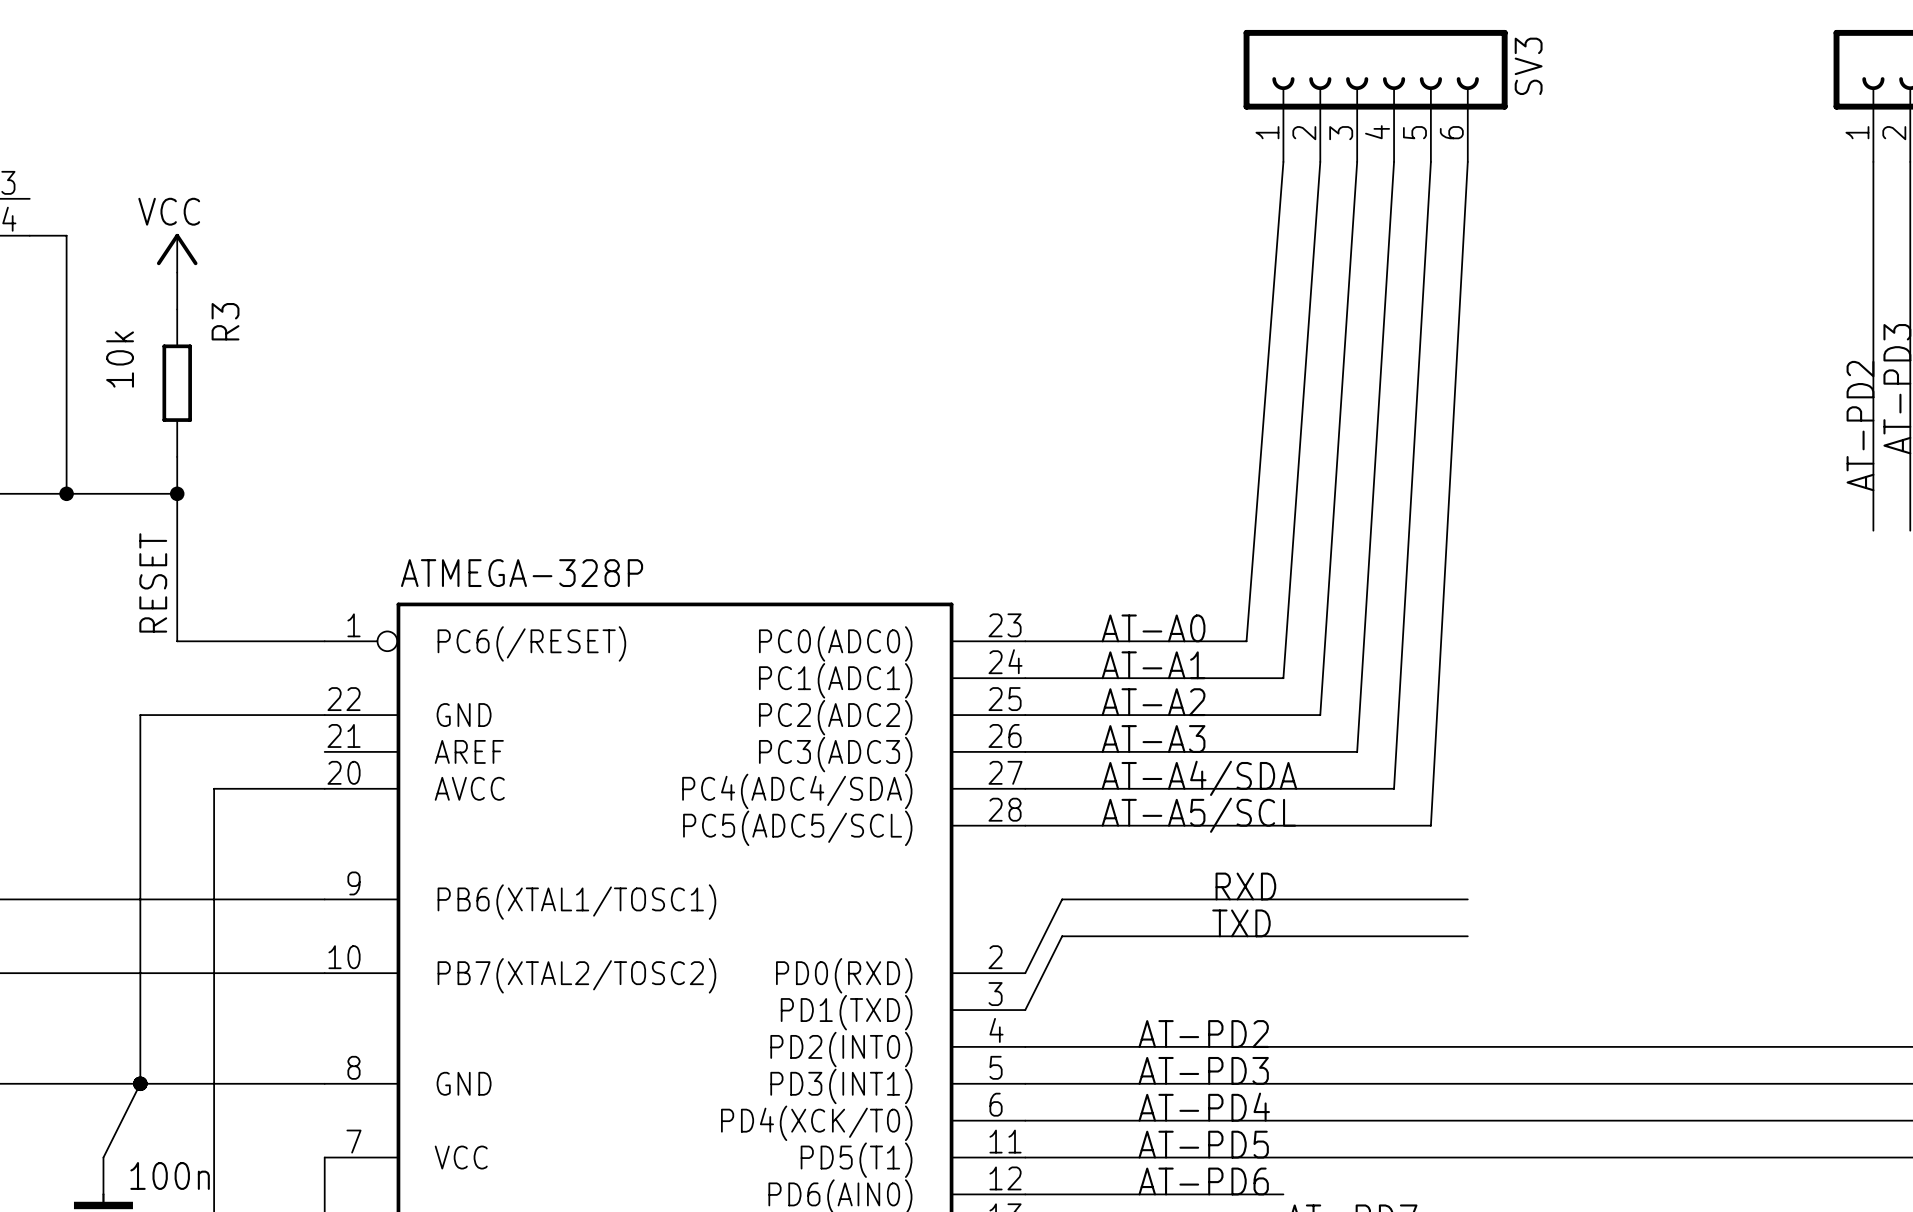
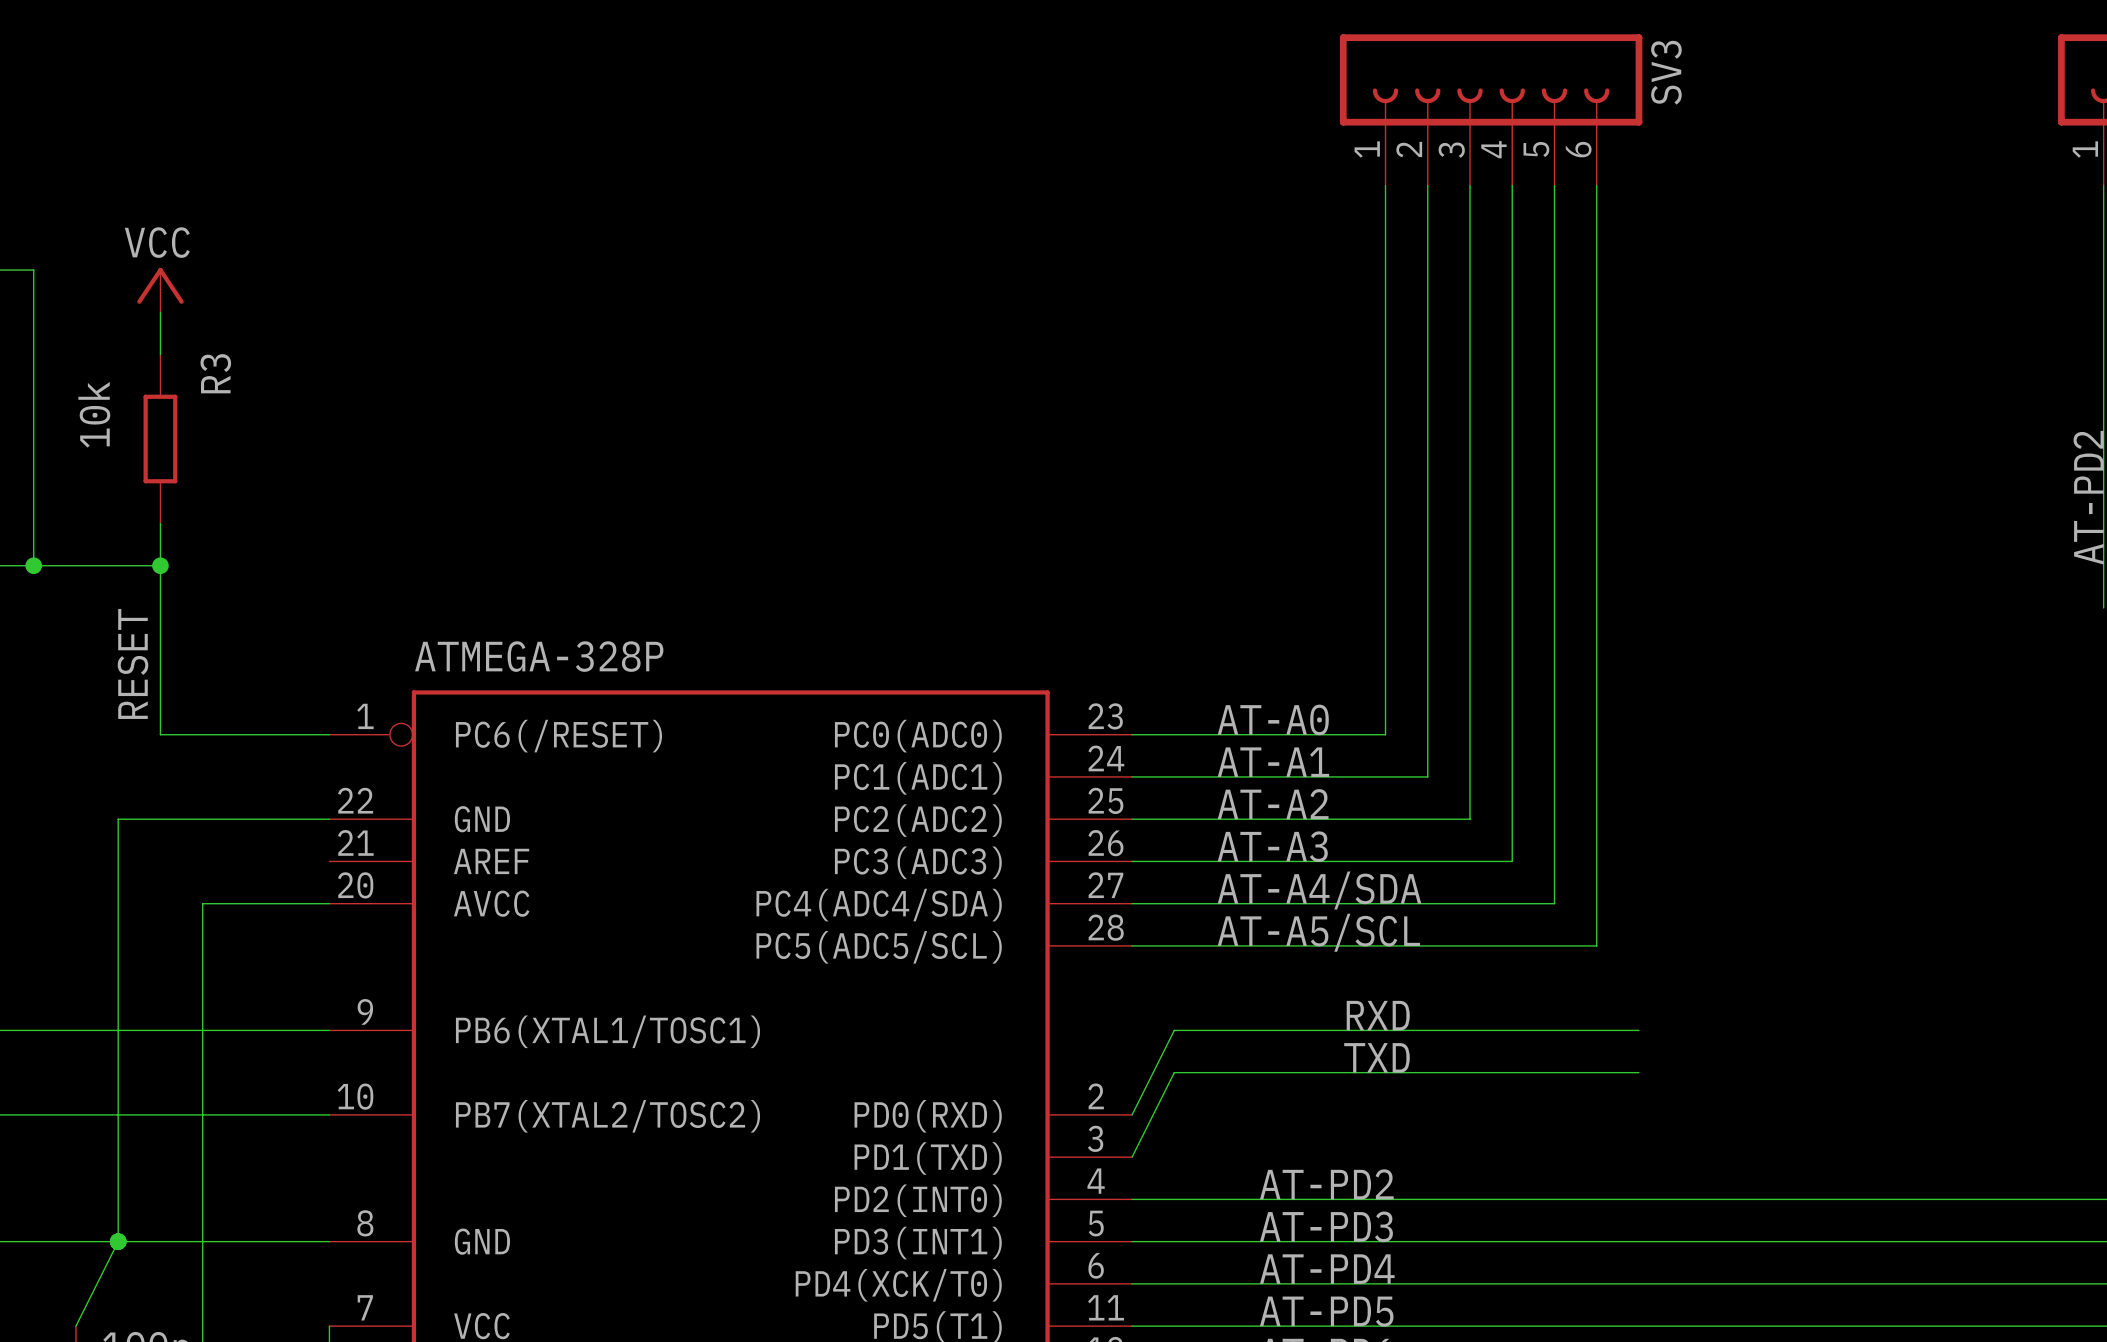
SV3 position: (1375, 95) -> (1491, 109)
wire: (1283, 161) (1246, 641) -> (1385, 185) (1385, 734)
wire: (1320, 161) (1283, 678) -> (1427, 185) (1427, 776)
wire: (1357, 161) (1320, 715) -> (1470, 185) (1470, 819)
wire: (1394, 161) (1357, 751) -> (1512, 185) (1512, 861)
wire: (1430, 161) (1394, 788) -> (1554, 185) (1554, 903)
wire: (1467, 161) (1430, 825) -> (1596, 185) (1596, 945)

